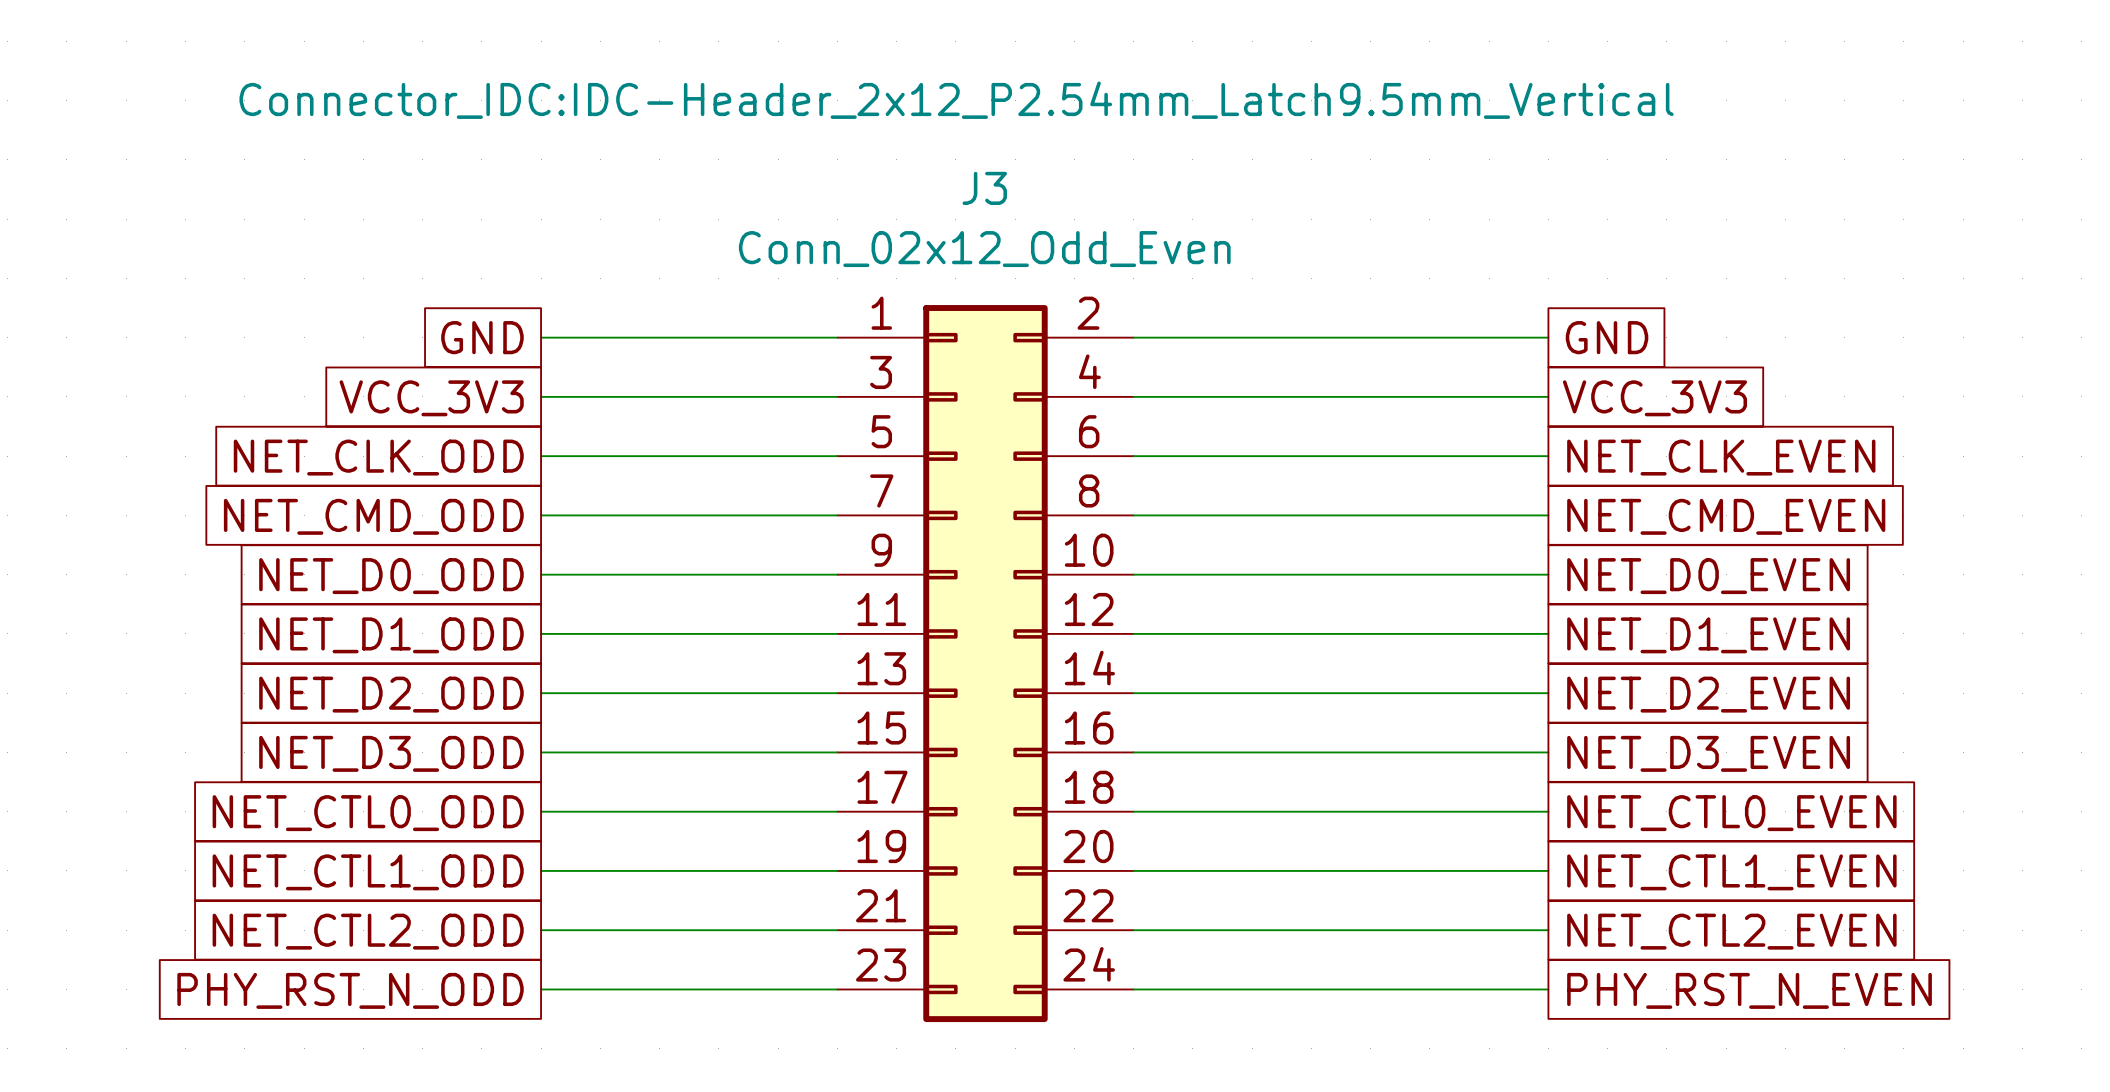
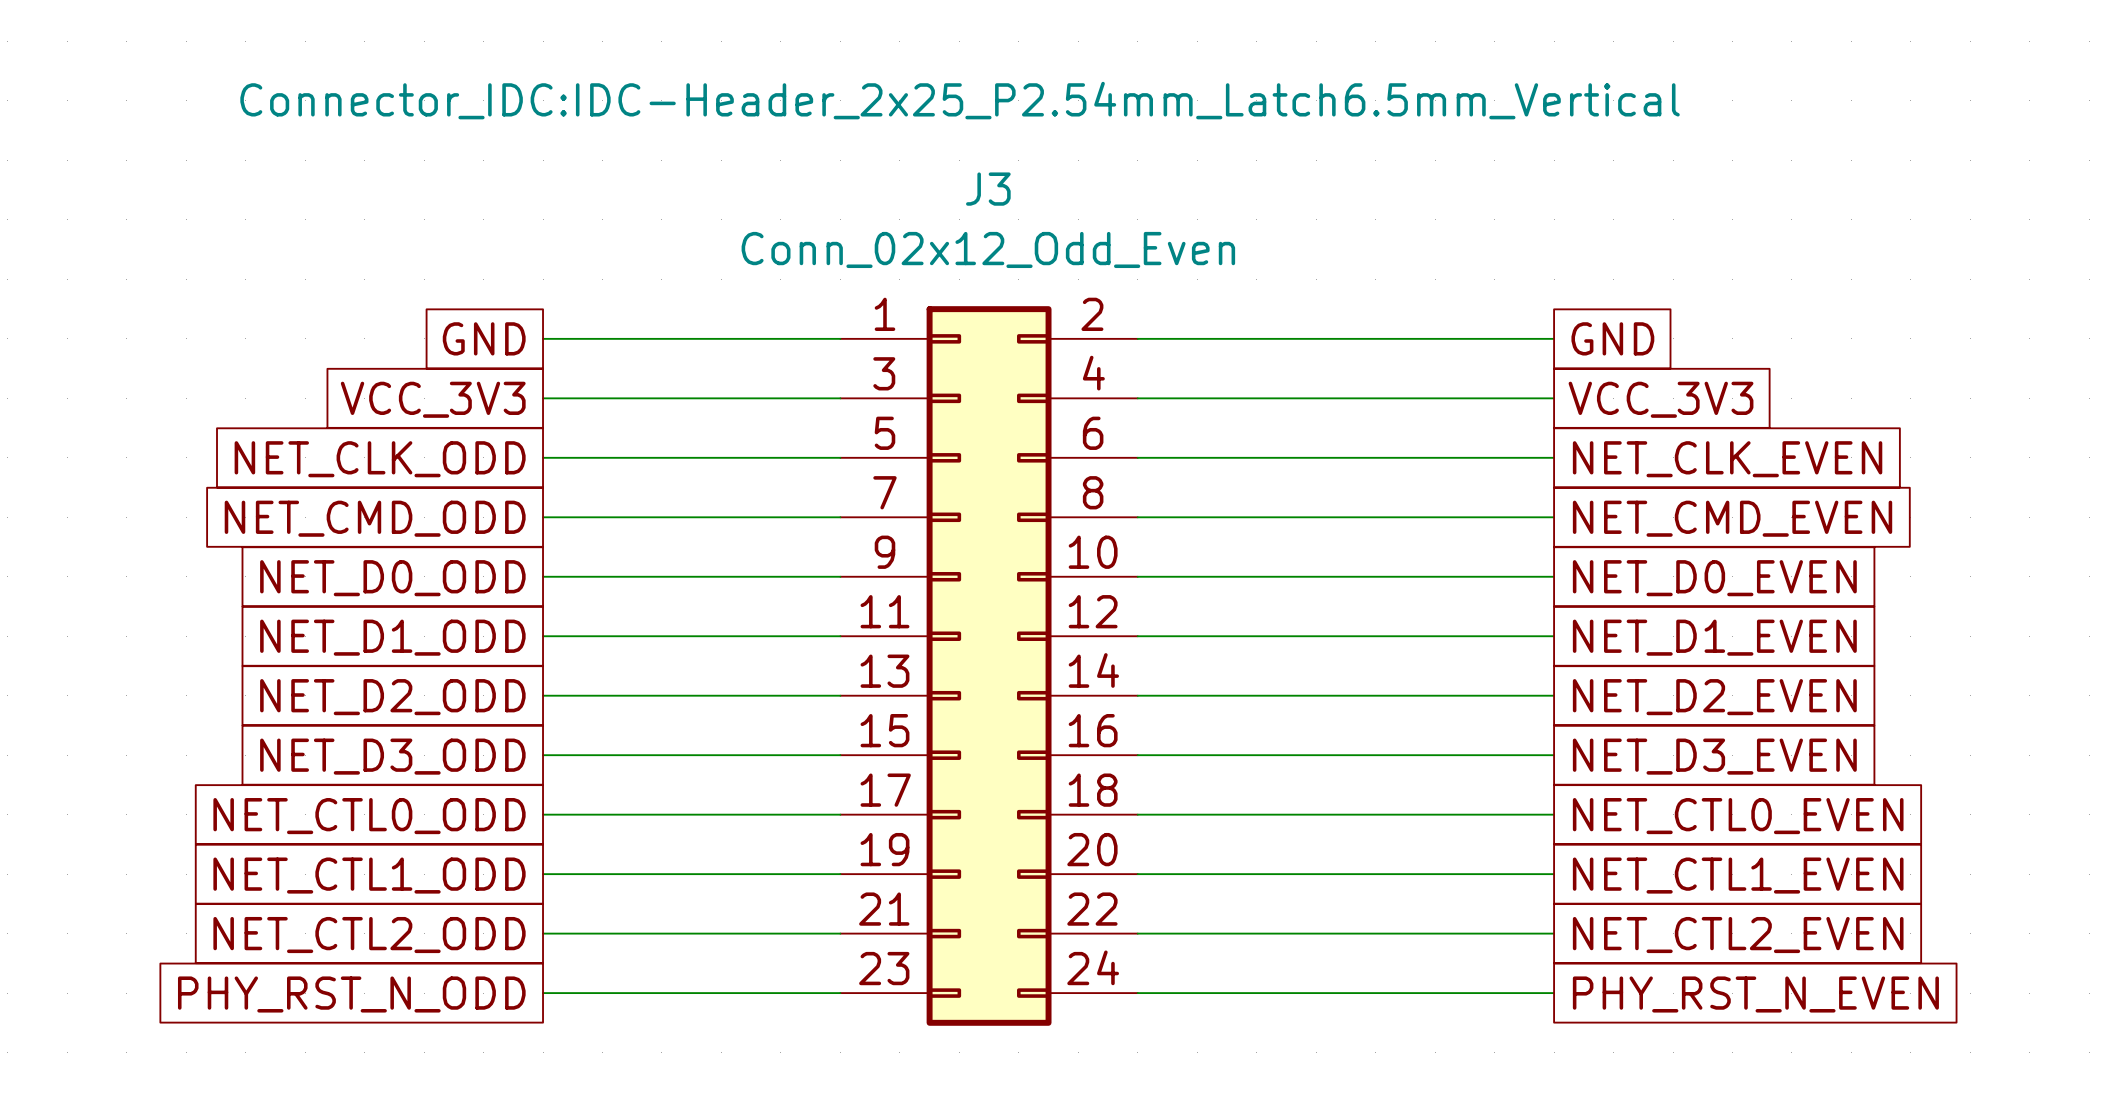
J3 text: Connector_IDC:IDC-Header_2x12_P2.54mm_Latch9.5mm_Vertical (956, 100) -> Connector_IDC:IDC-Header_2x25_P2.54mm_Latch6.5mm_Vertical (960, 100)

